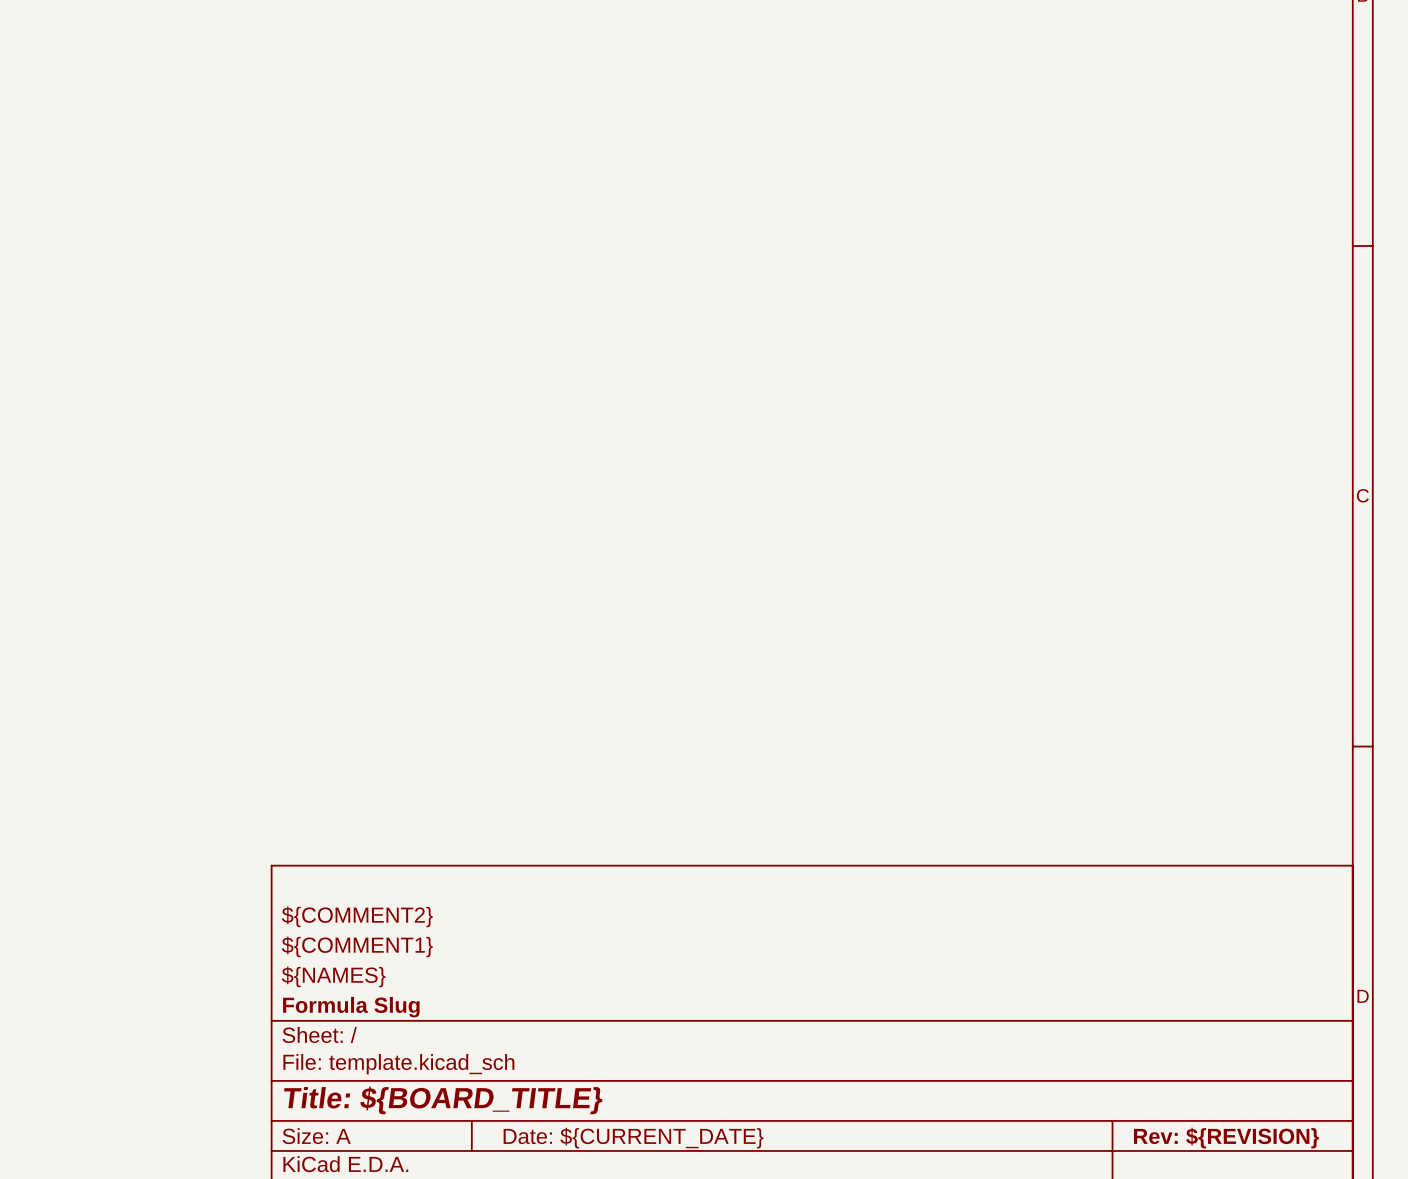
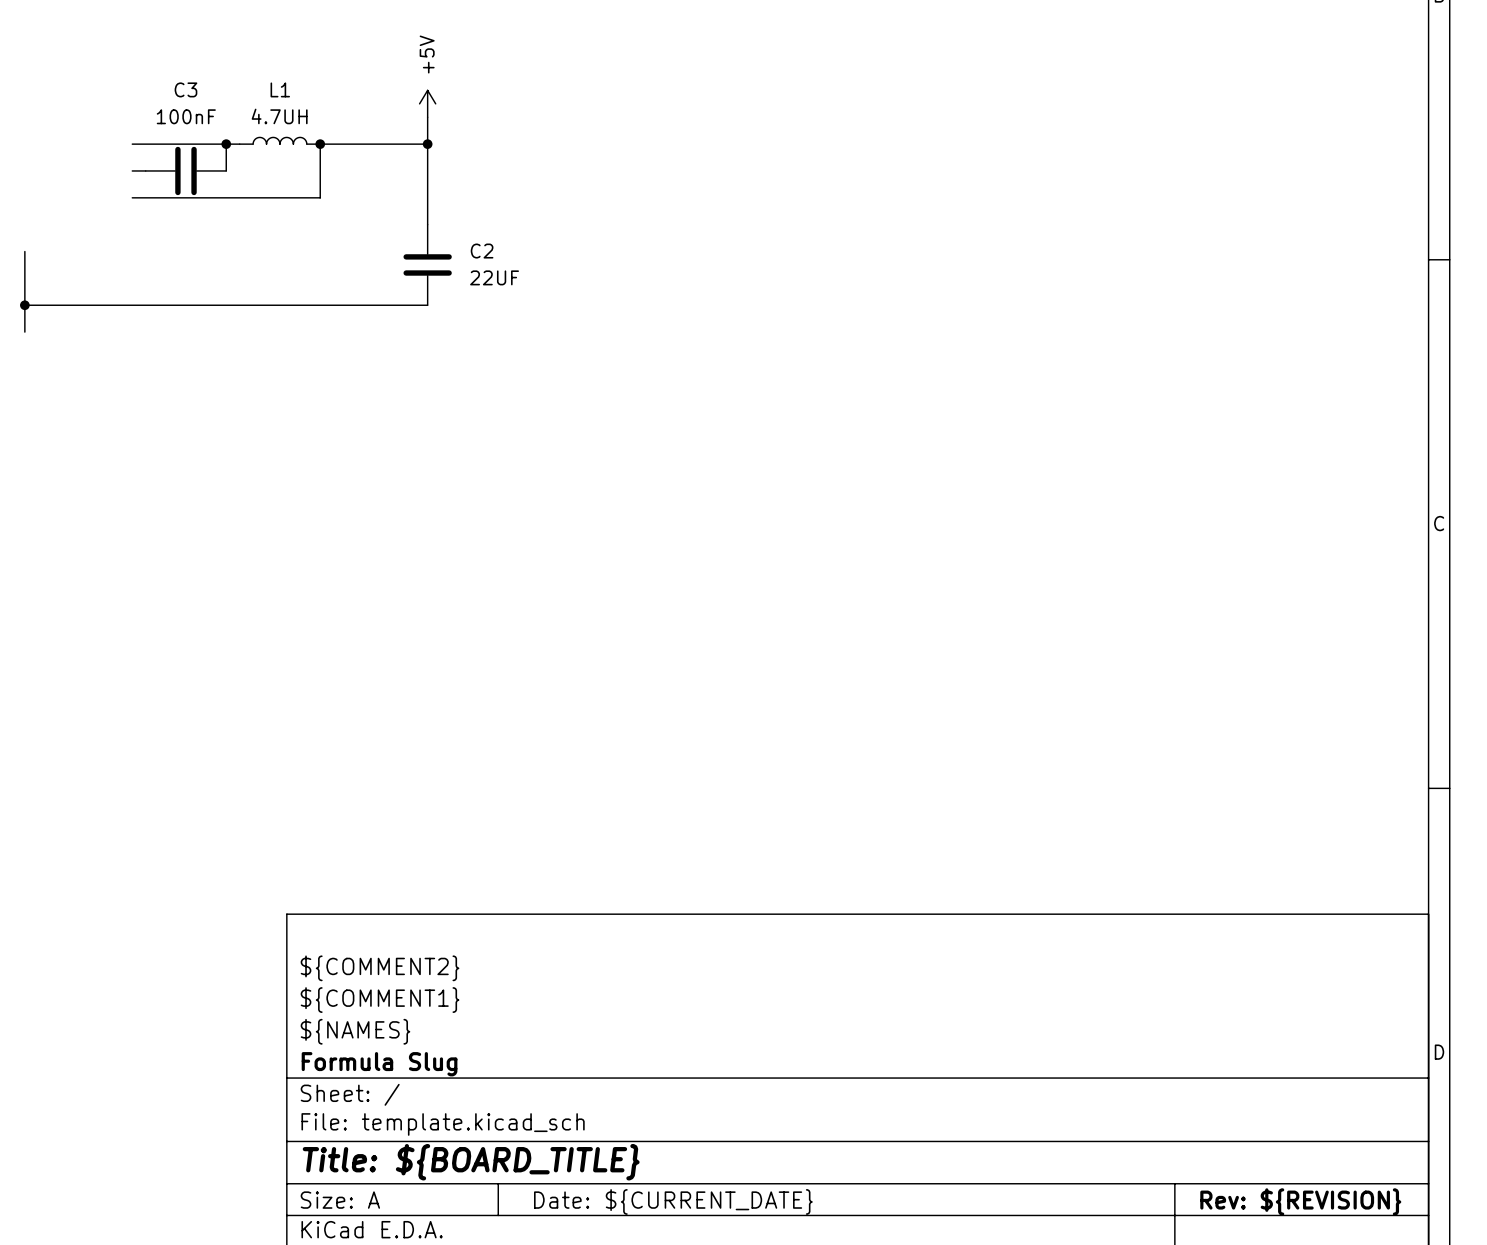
power symbol: none -> +5V (427, 103)
wire: none -> (427, 117) (427, 224)
L1: none -> 4.7UH (279, 140)
wire: none -> (132, 144) (239, 144)
wire: none -> (226, 144) (226, 170)
junction: none -> (226, 144)
junction: none -> (320, 144)
wire: none -> (427, 144) (320, 144) (320, 197) (132, 197)
junction: none -> (427, 144)
wire: none -> (132, 170) (145, 170)
C3: none -> 100nF (185, 170)
wire: none -> (24, 251) (24, 332)
C2: none -> 22UF (427, 264)
wire: none -> (24, 305) (427, 305)
junction: none -> (24, 305)

